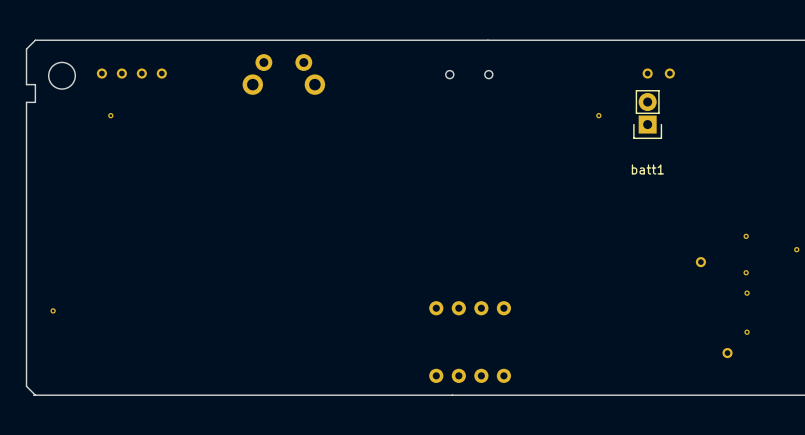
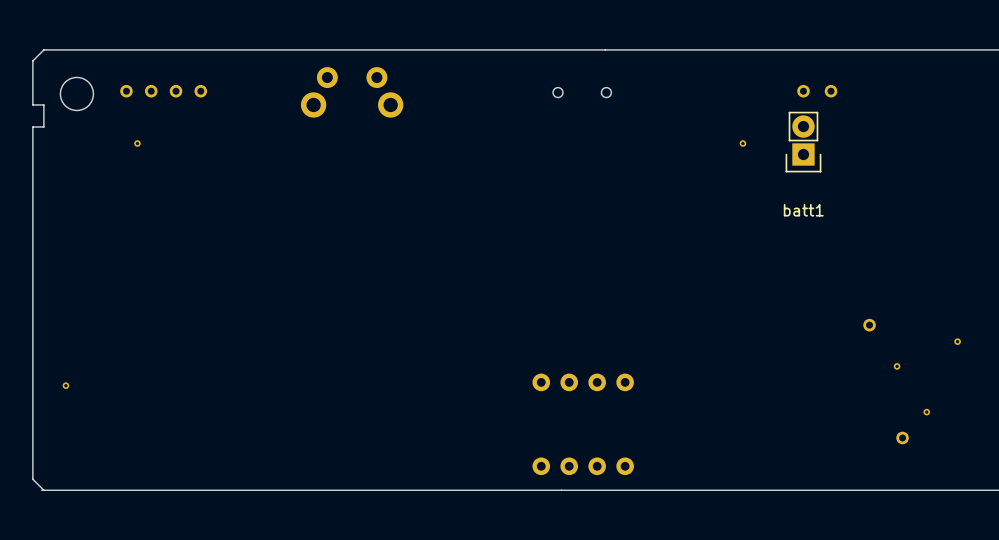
part: (746, 236) -> none
part: (796, 249) -> none
part: (746, 272) -> none
part: none -> (957, 341)
part: (747, 293) -> none
part: none -> (897, 366)

